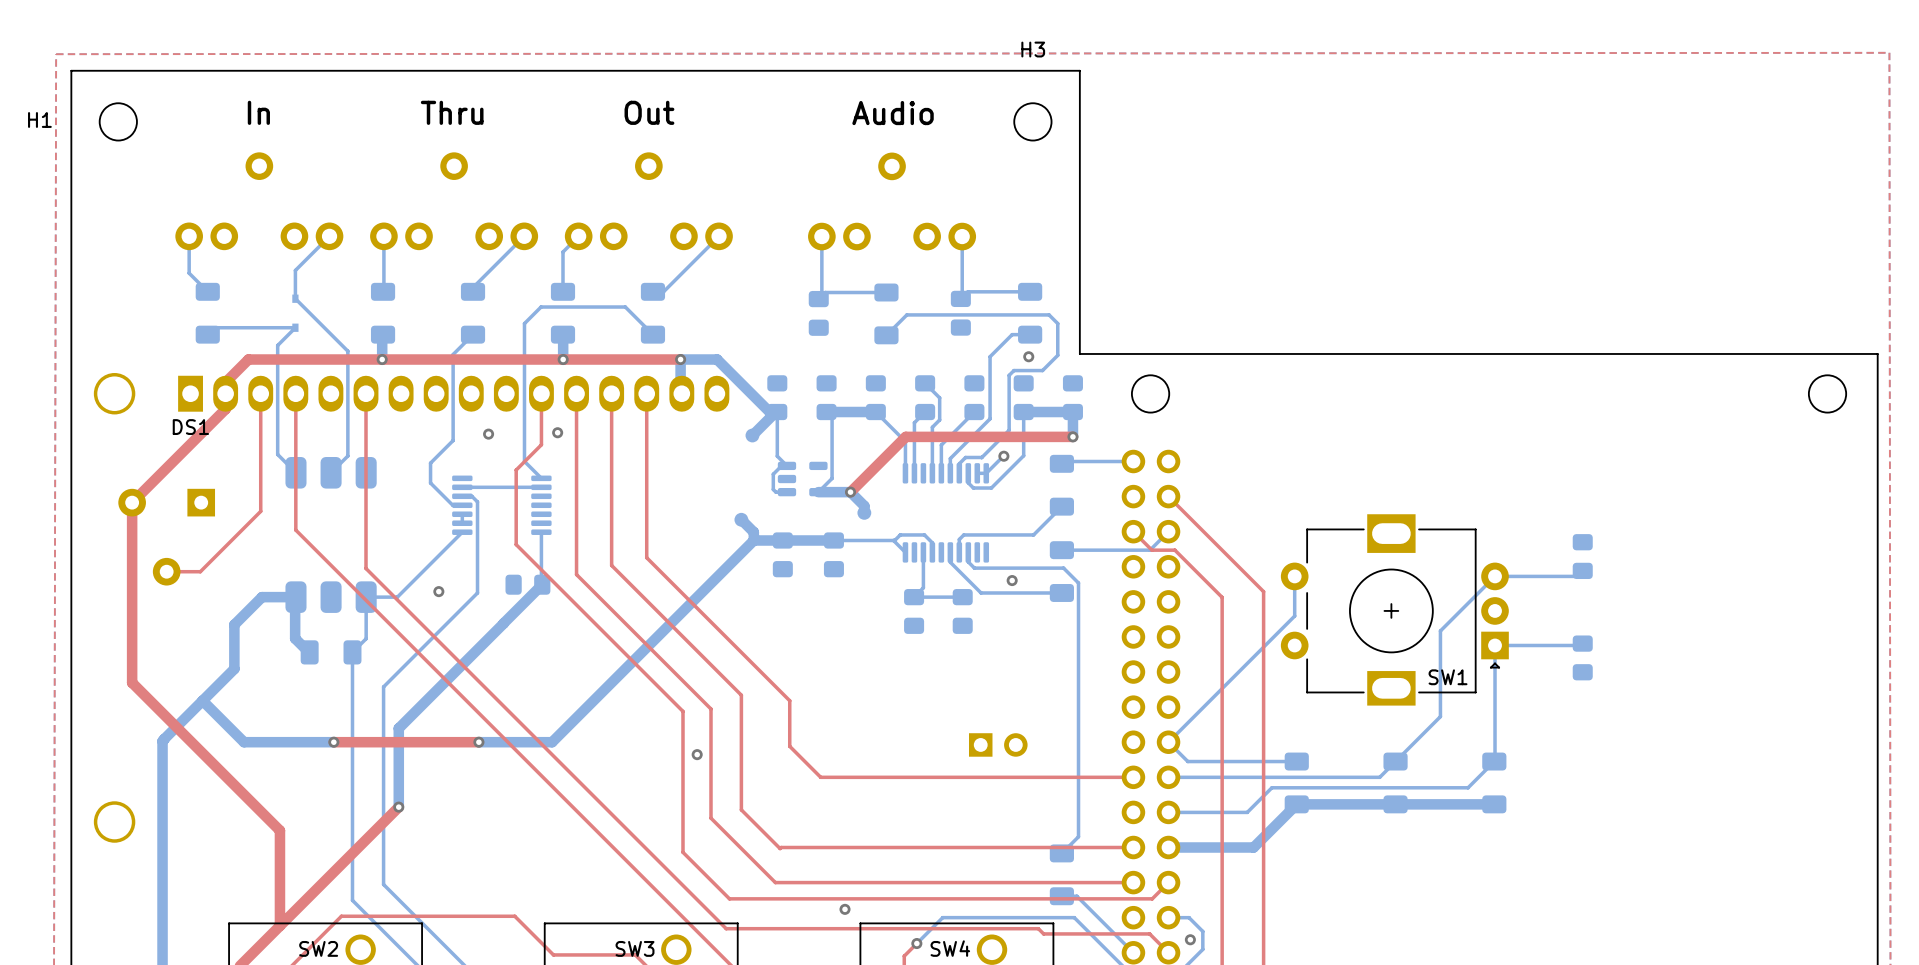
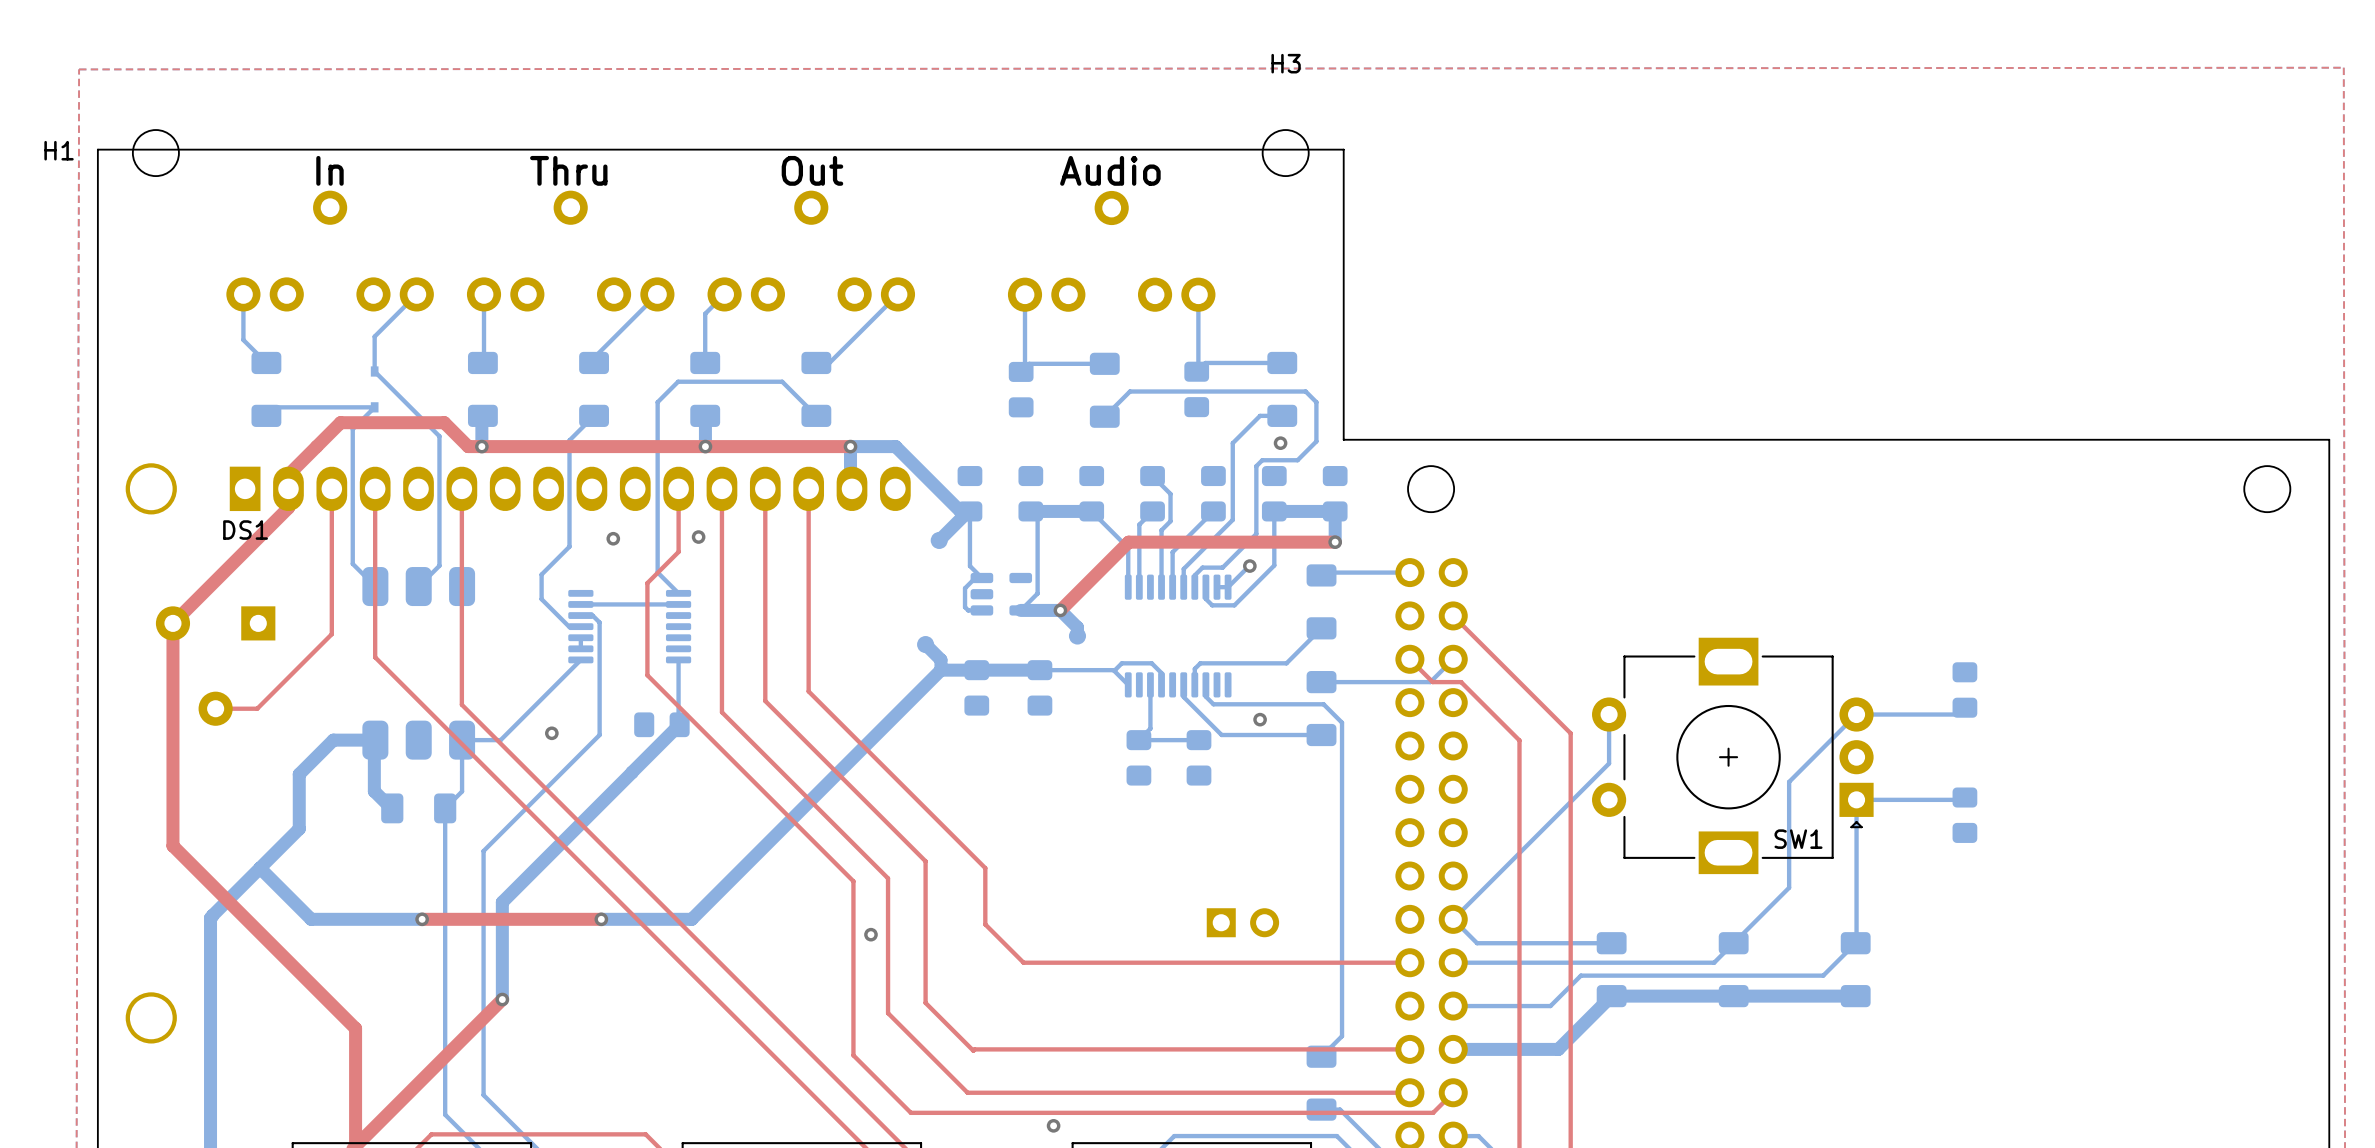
text position: In (258, 112) -> In (329, 170)
text position: Thru (452, 112) -> Thru (568, 170)
text position: Out (649, 112) -> Out (812, 170)
text position: Audio (893, 113) -> Audio (1110, 170)
board edge: (71, 119) (71, 70) (1079, 70) (1079, 119) -> (97, 149) (1343, 149)
top track: (248, 359) (371, 359) -> (316, 446) (340, 422) (444, 422) (468, 446)

